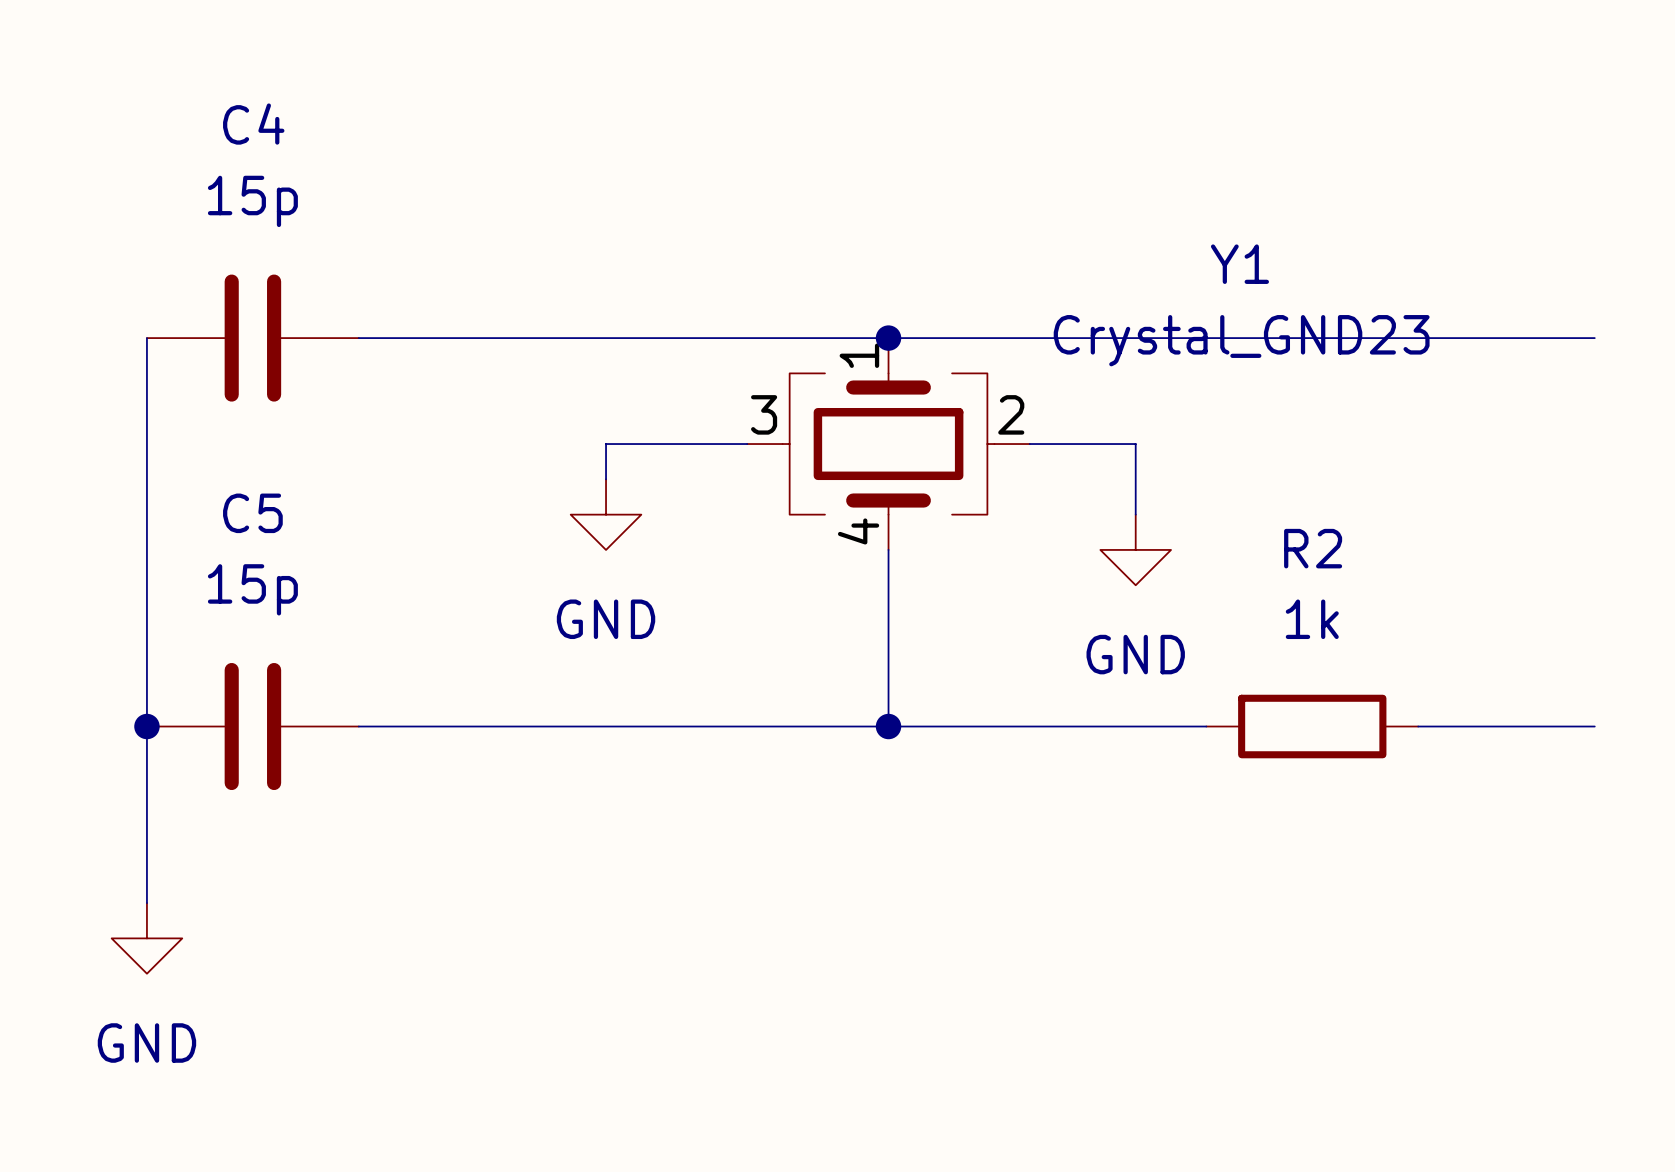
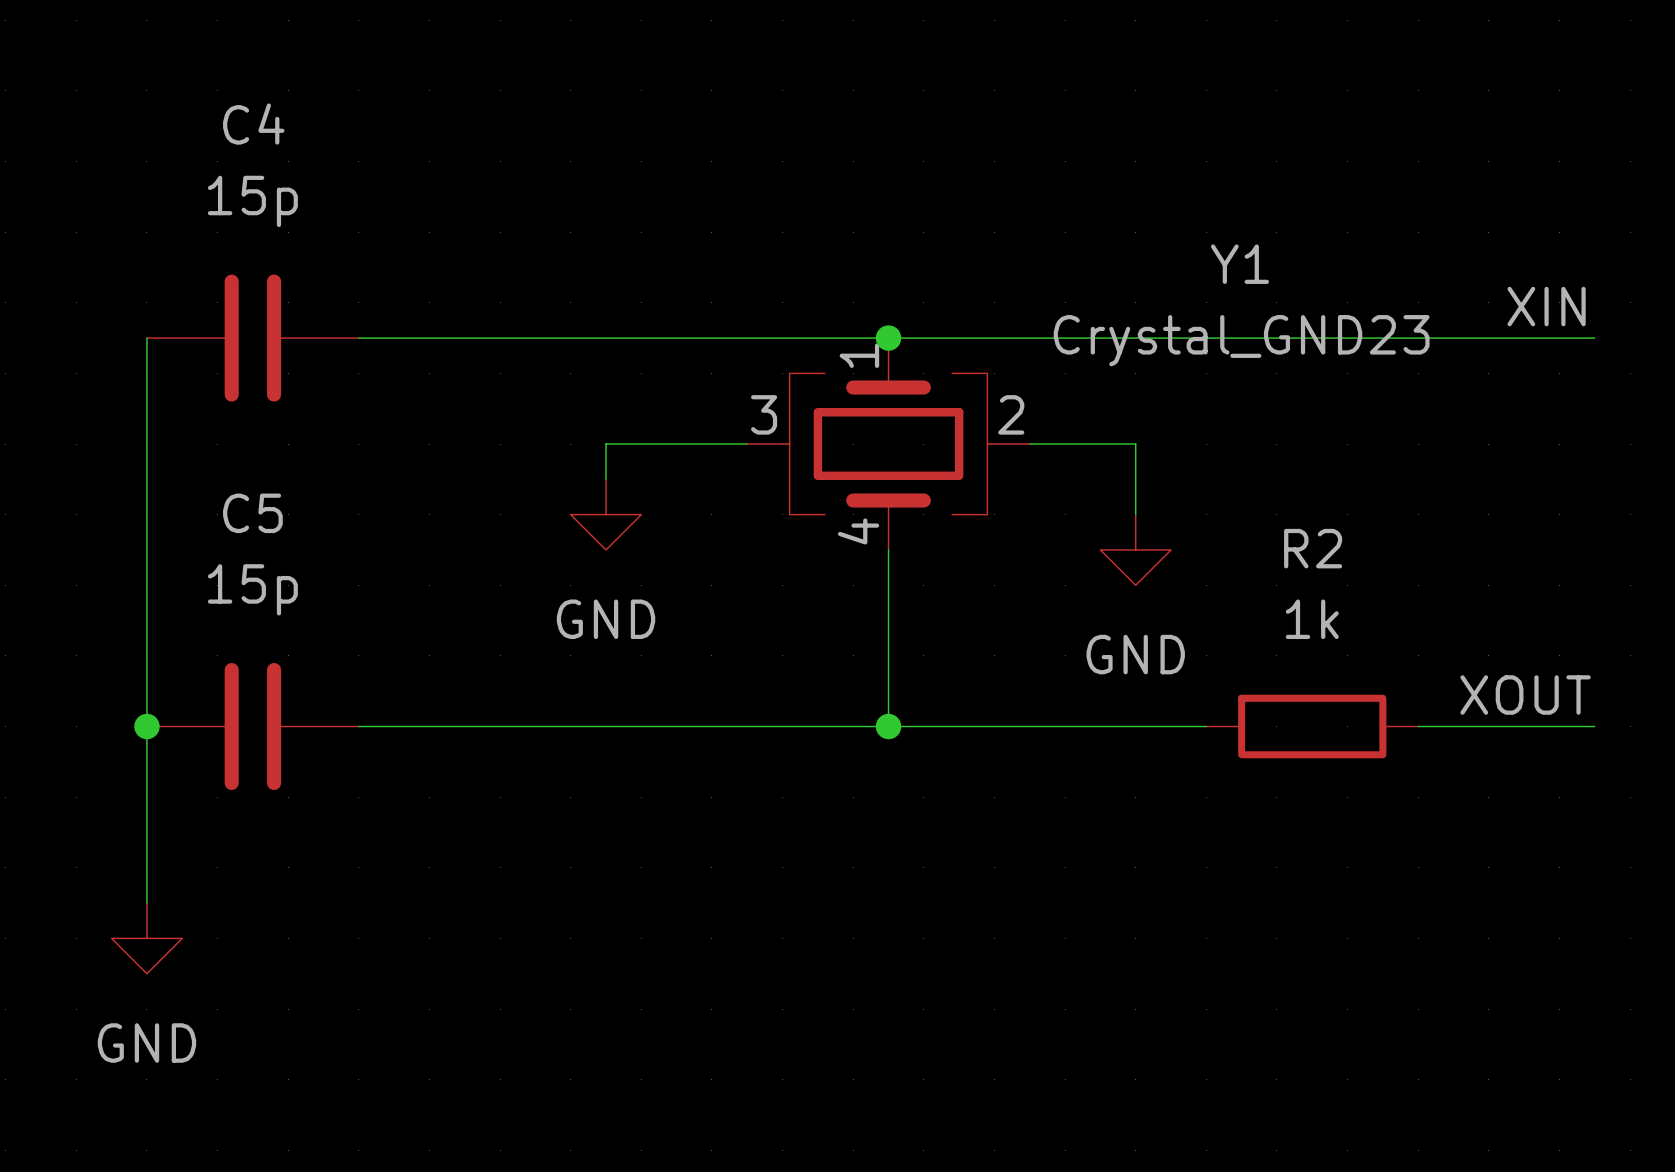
label: none -> XIN (1546, 306)
label: none -> XOUT (1525, 695)

